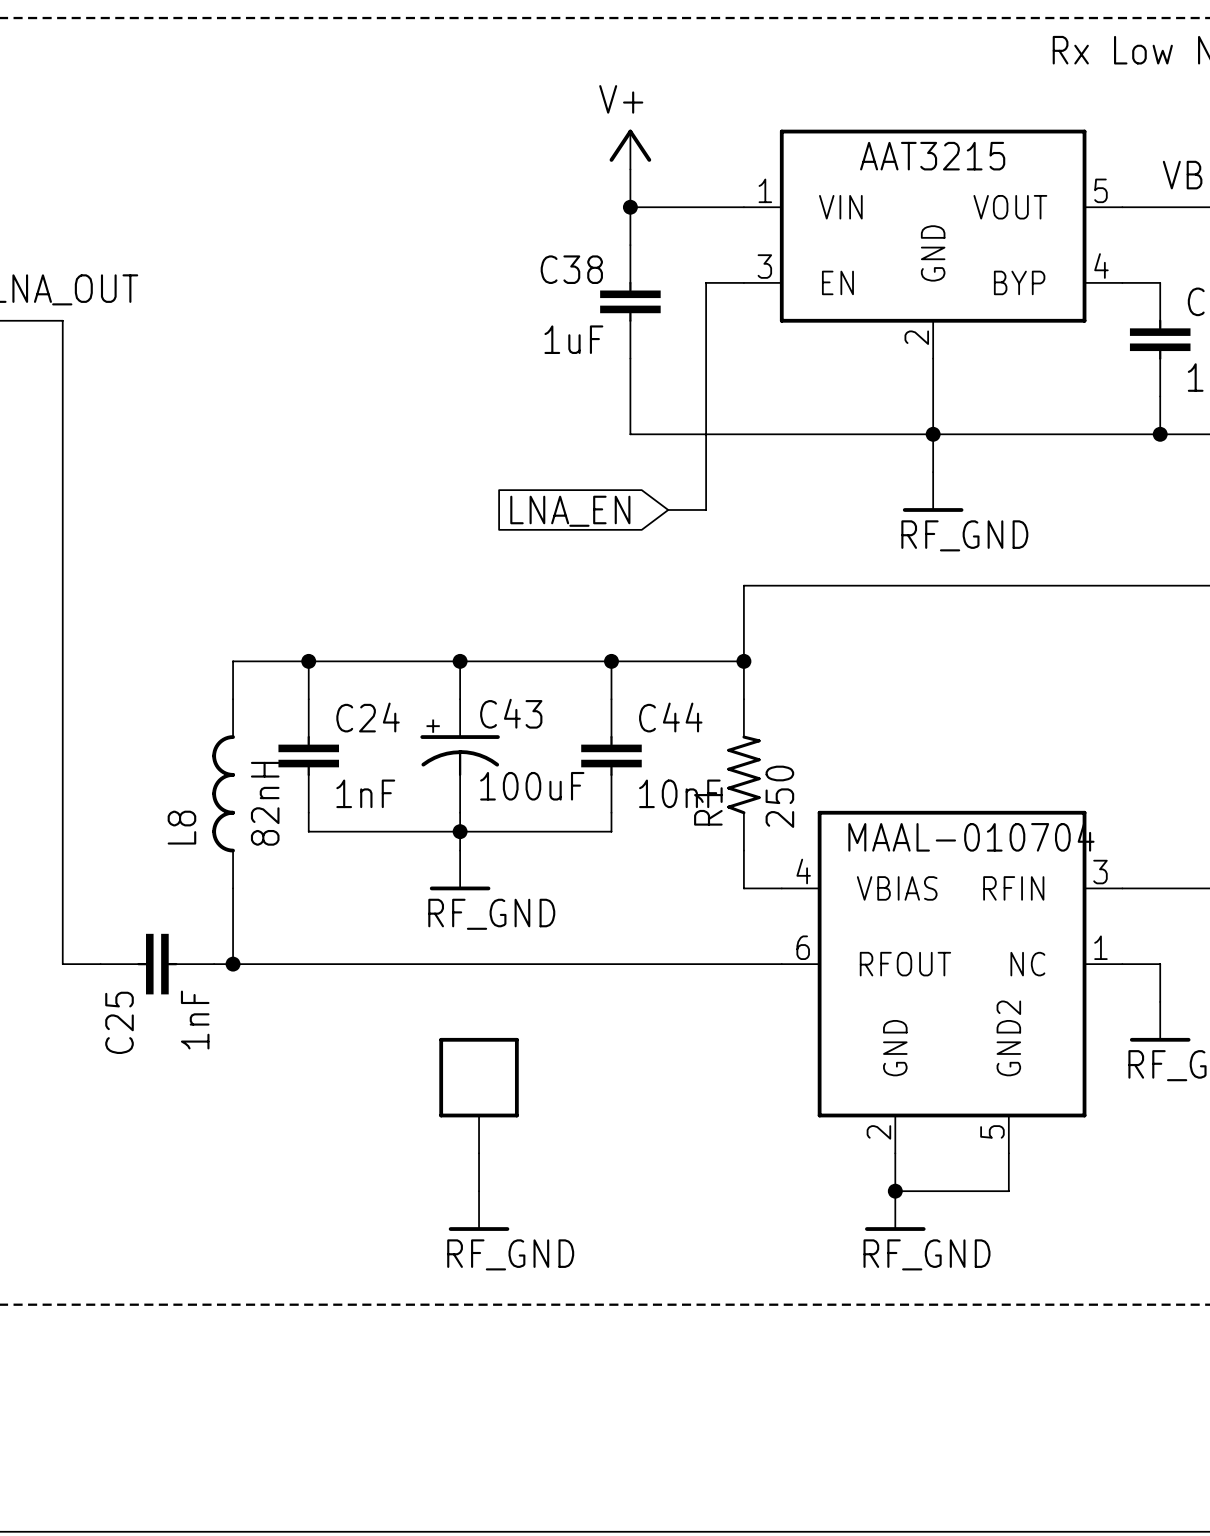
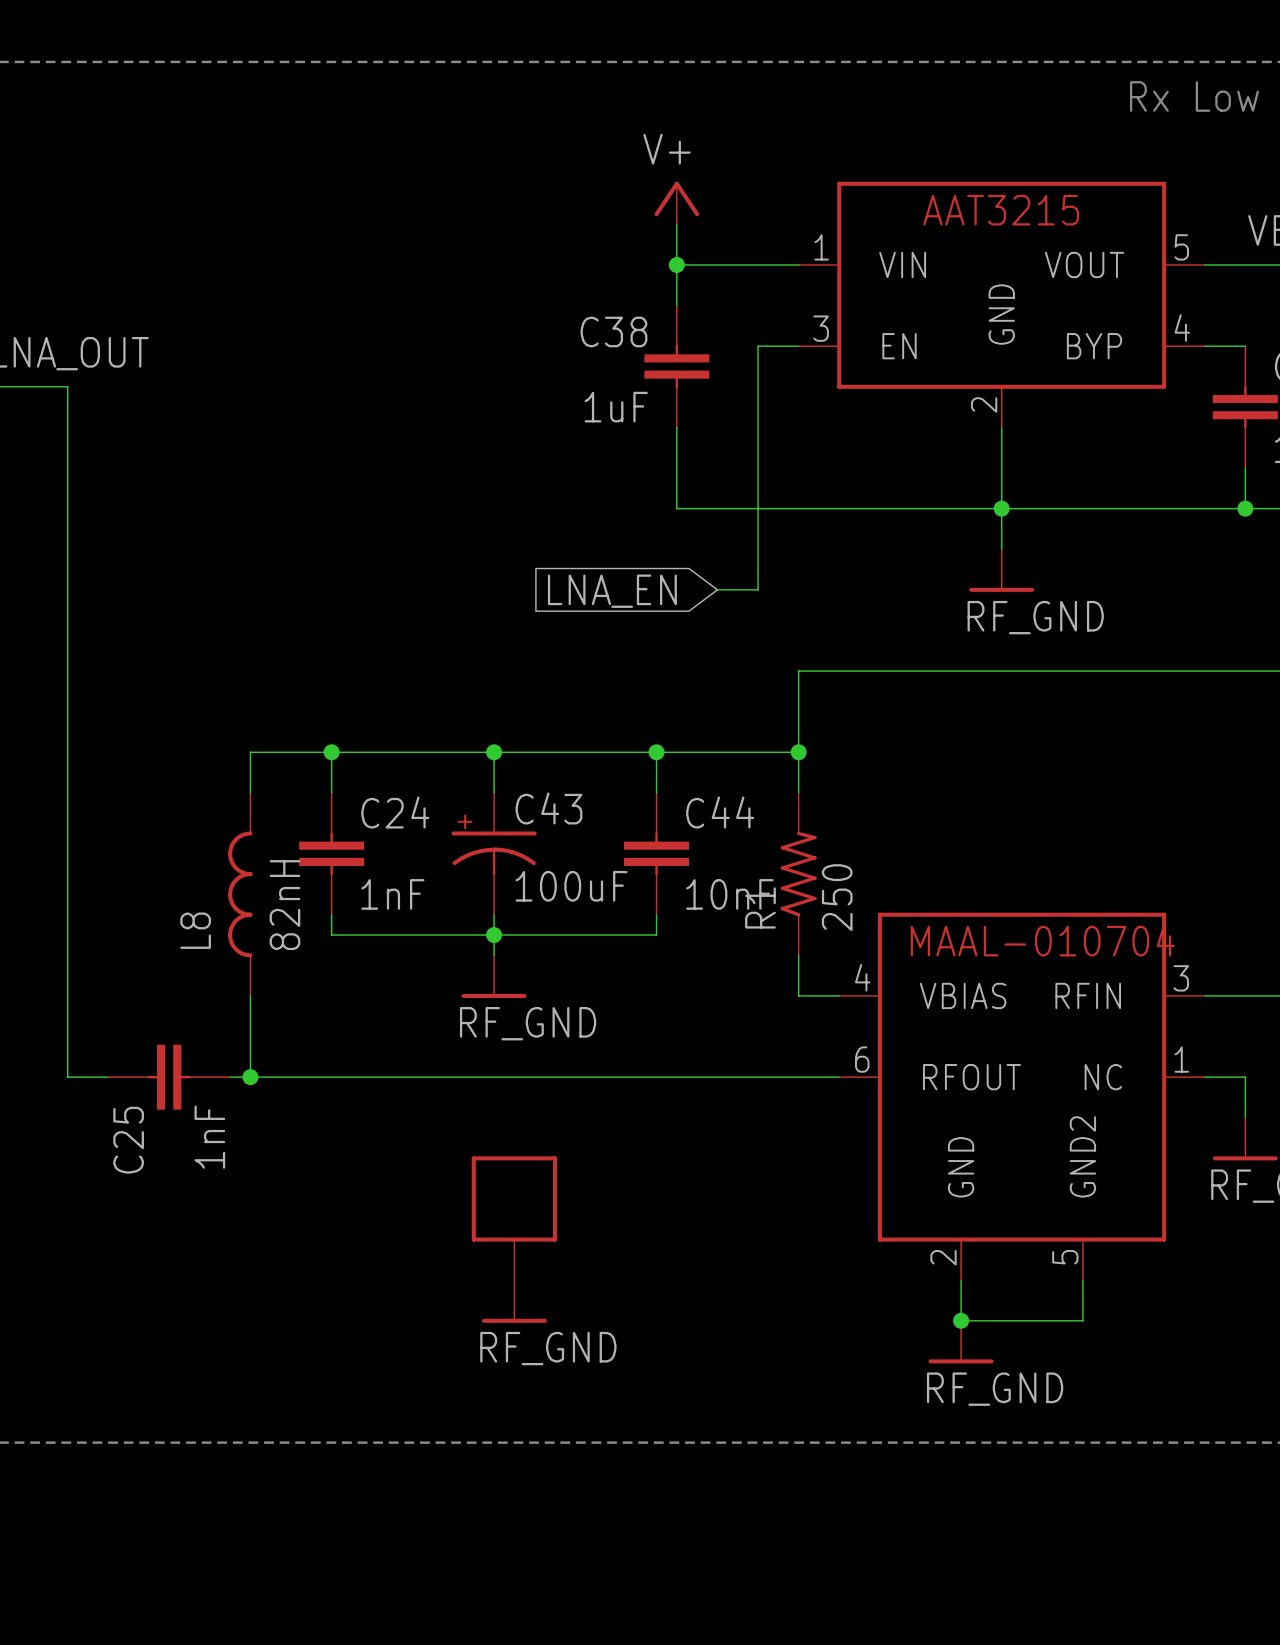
power symbol position: RF_GND (479, 1211) -> RF_GND (514, 1301)

